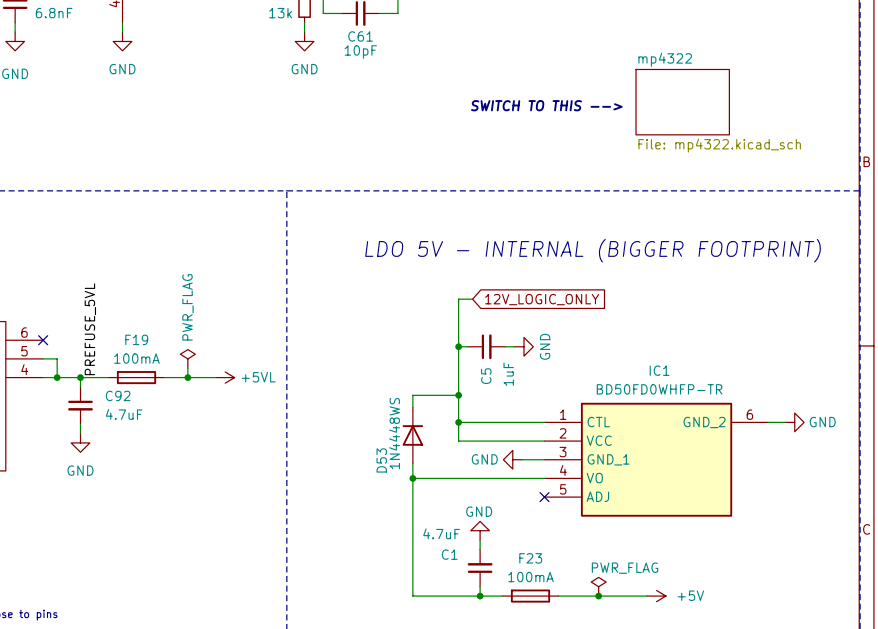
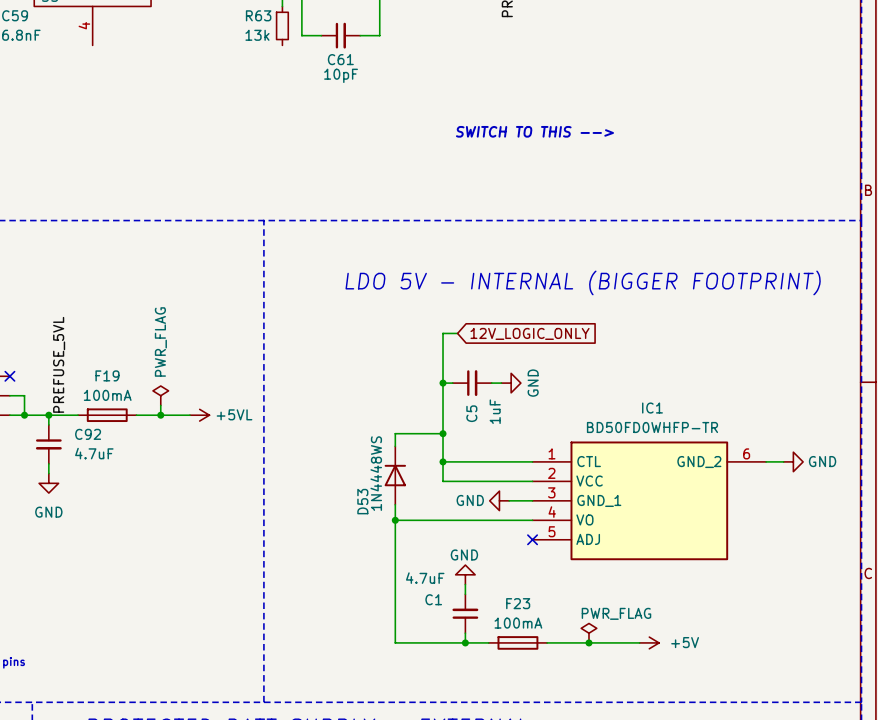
wire: (122, 22) (122, 32) -> none
wire: (304, 22) (304, 32) -> none
power symbol: GND (122, 41) -> none
power symbol: GND (304, 41) -> none
sheet mp4322: File: mp4322.kicad_sch (682, 102) -> none

